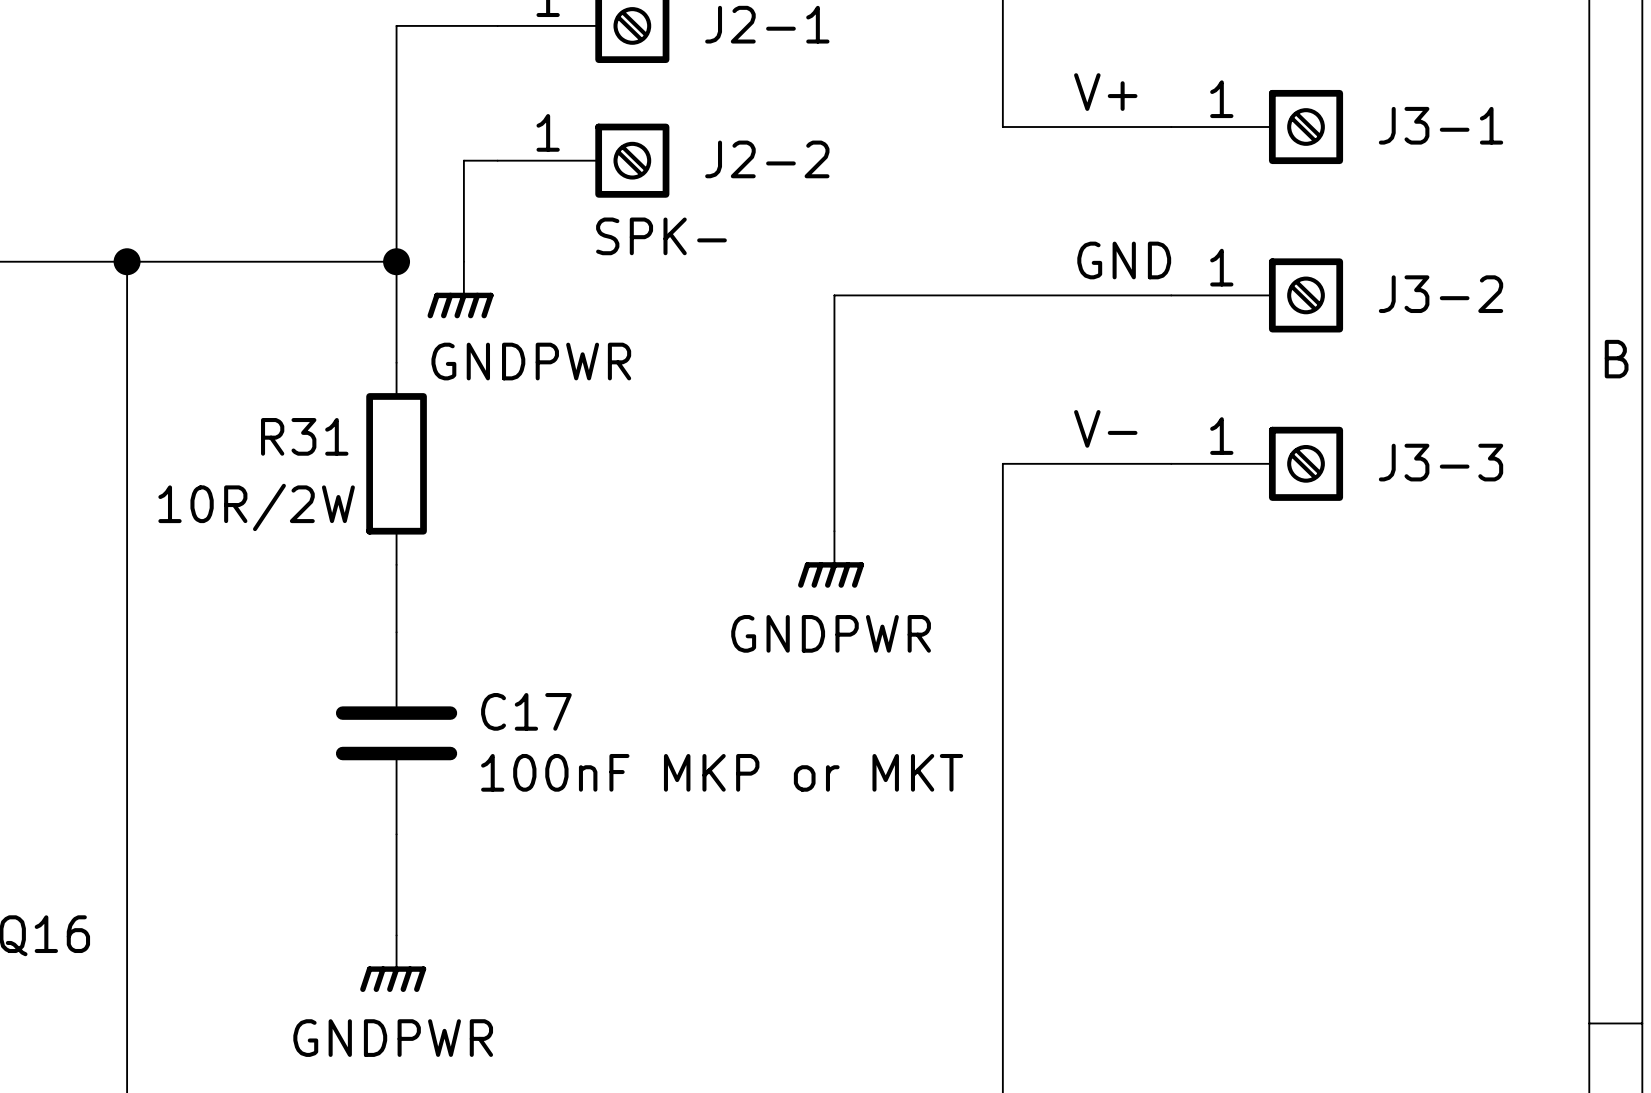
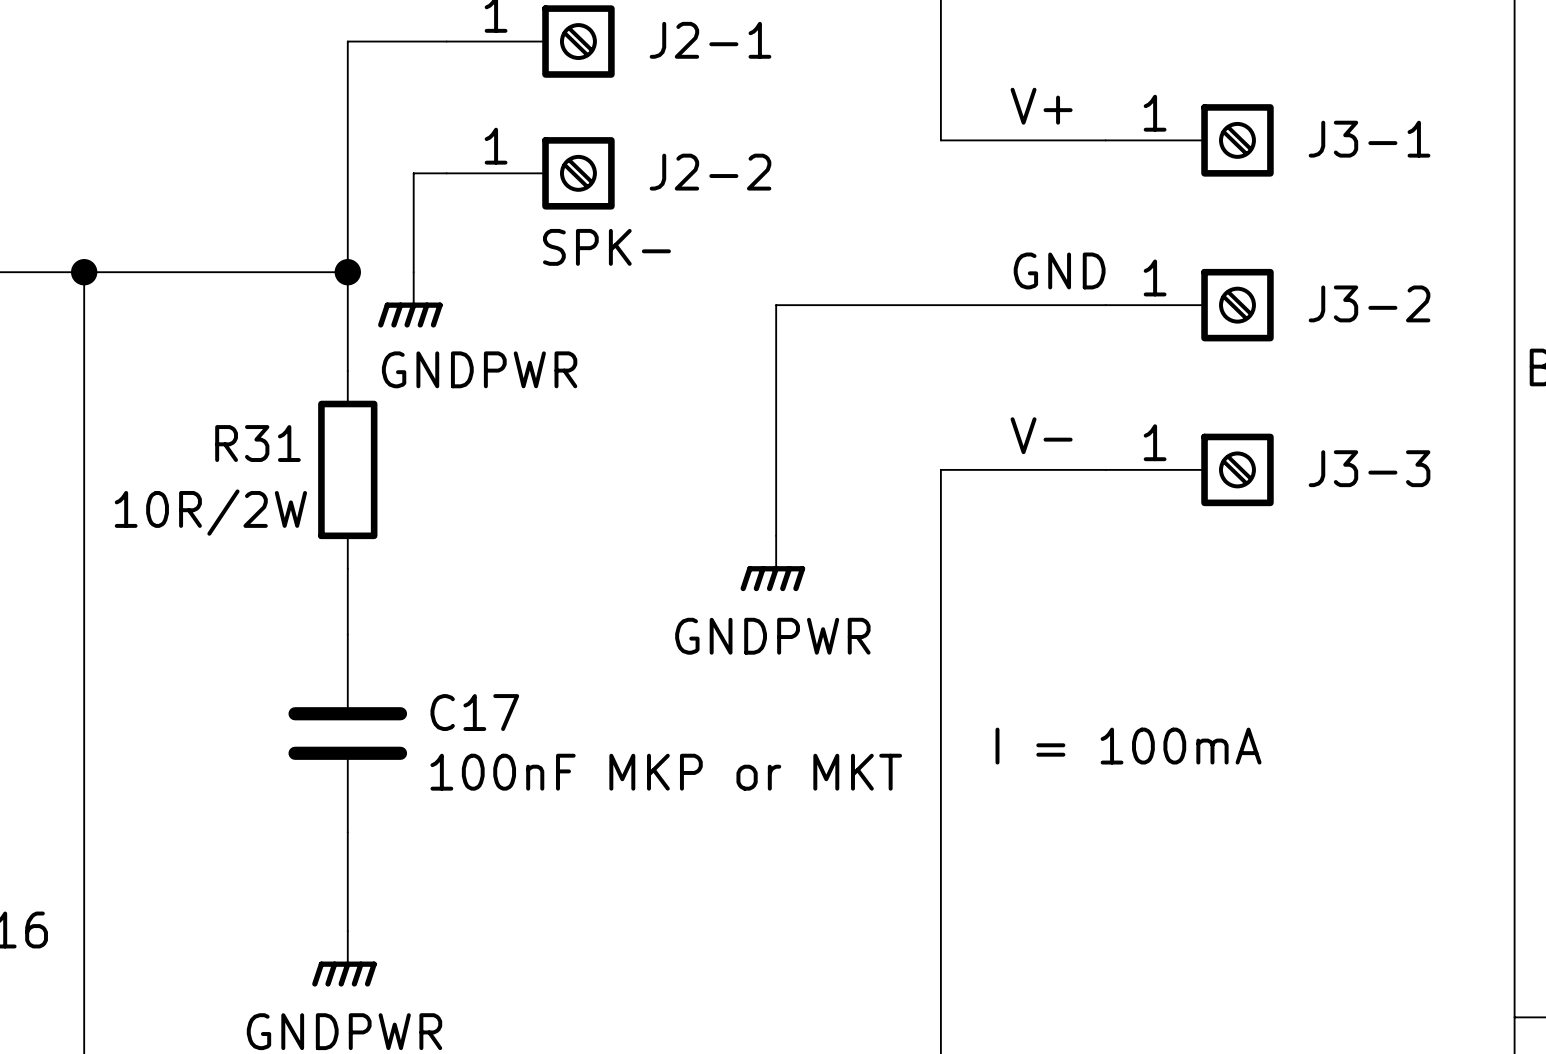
text: none -> I = 100mA (1128, 746)

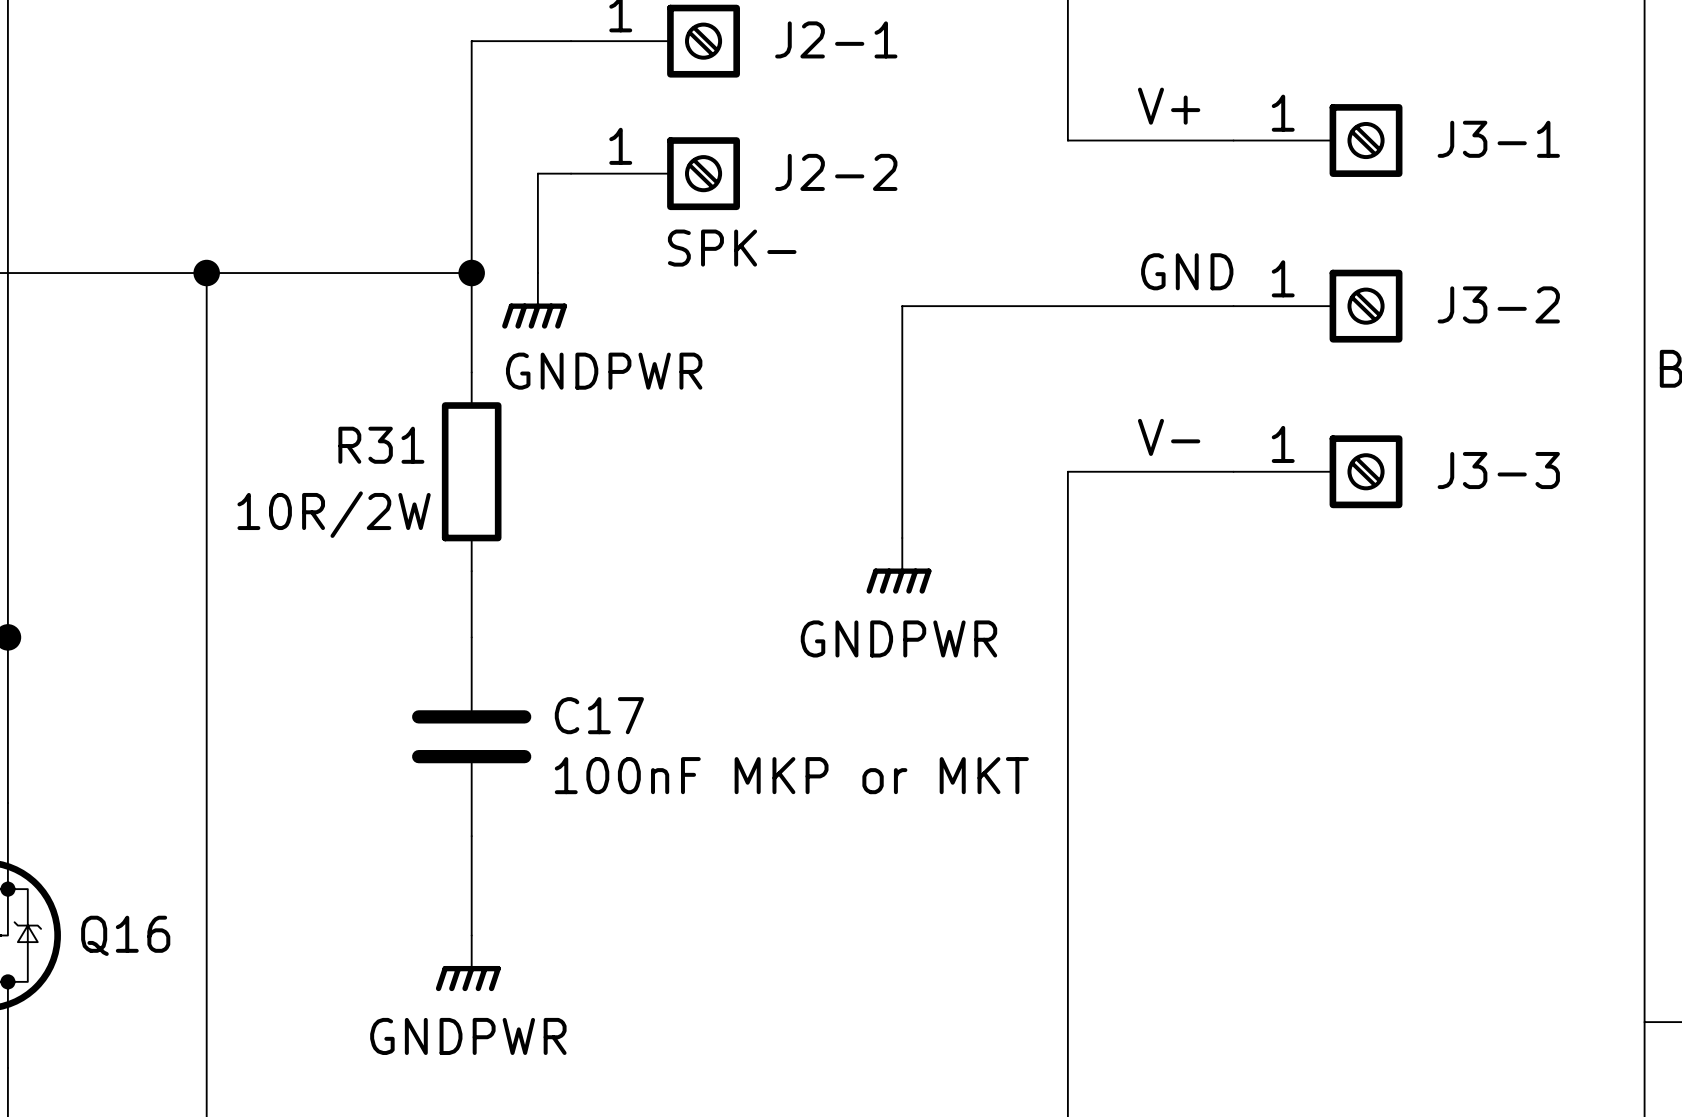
text: I = 100mA (1128, 746) -> none

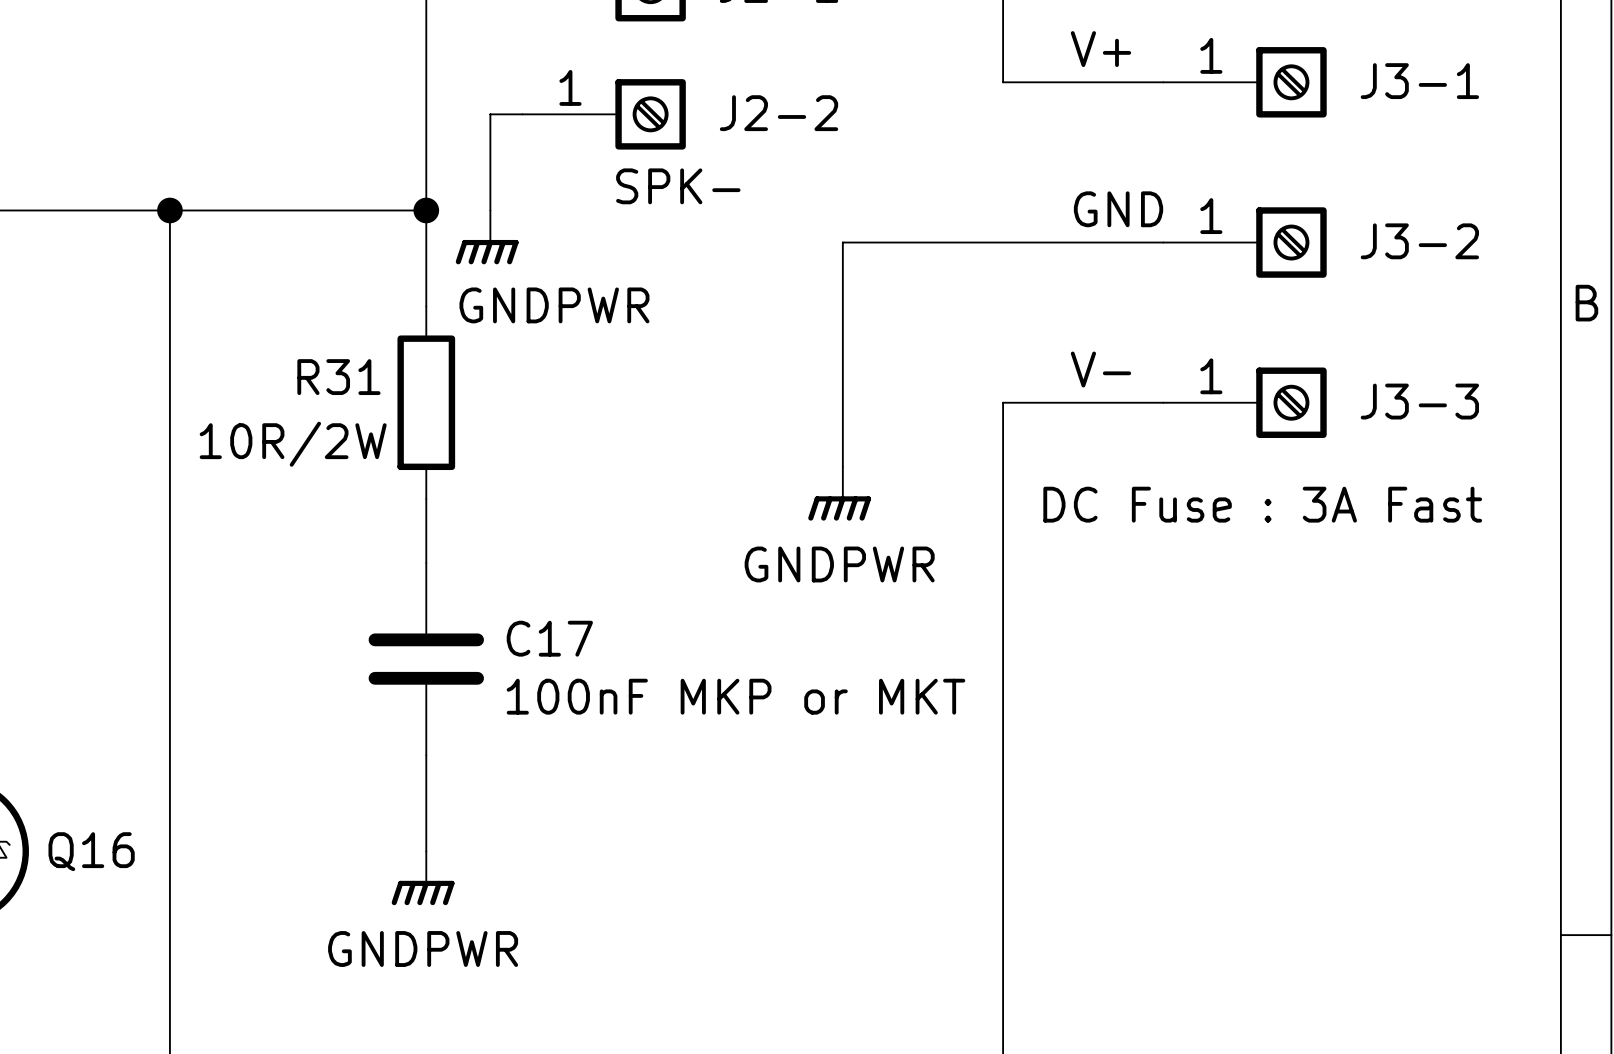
text: none -> DC Fuse : 3A Fast (1262, 504)

